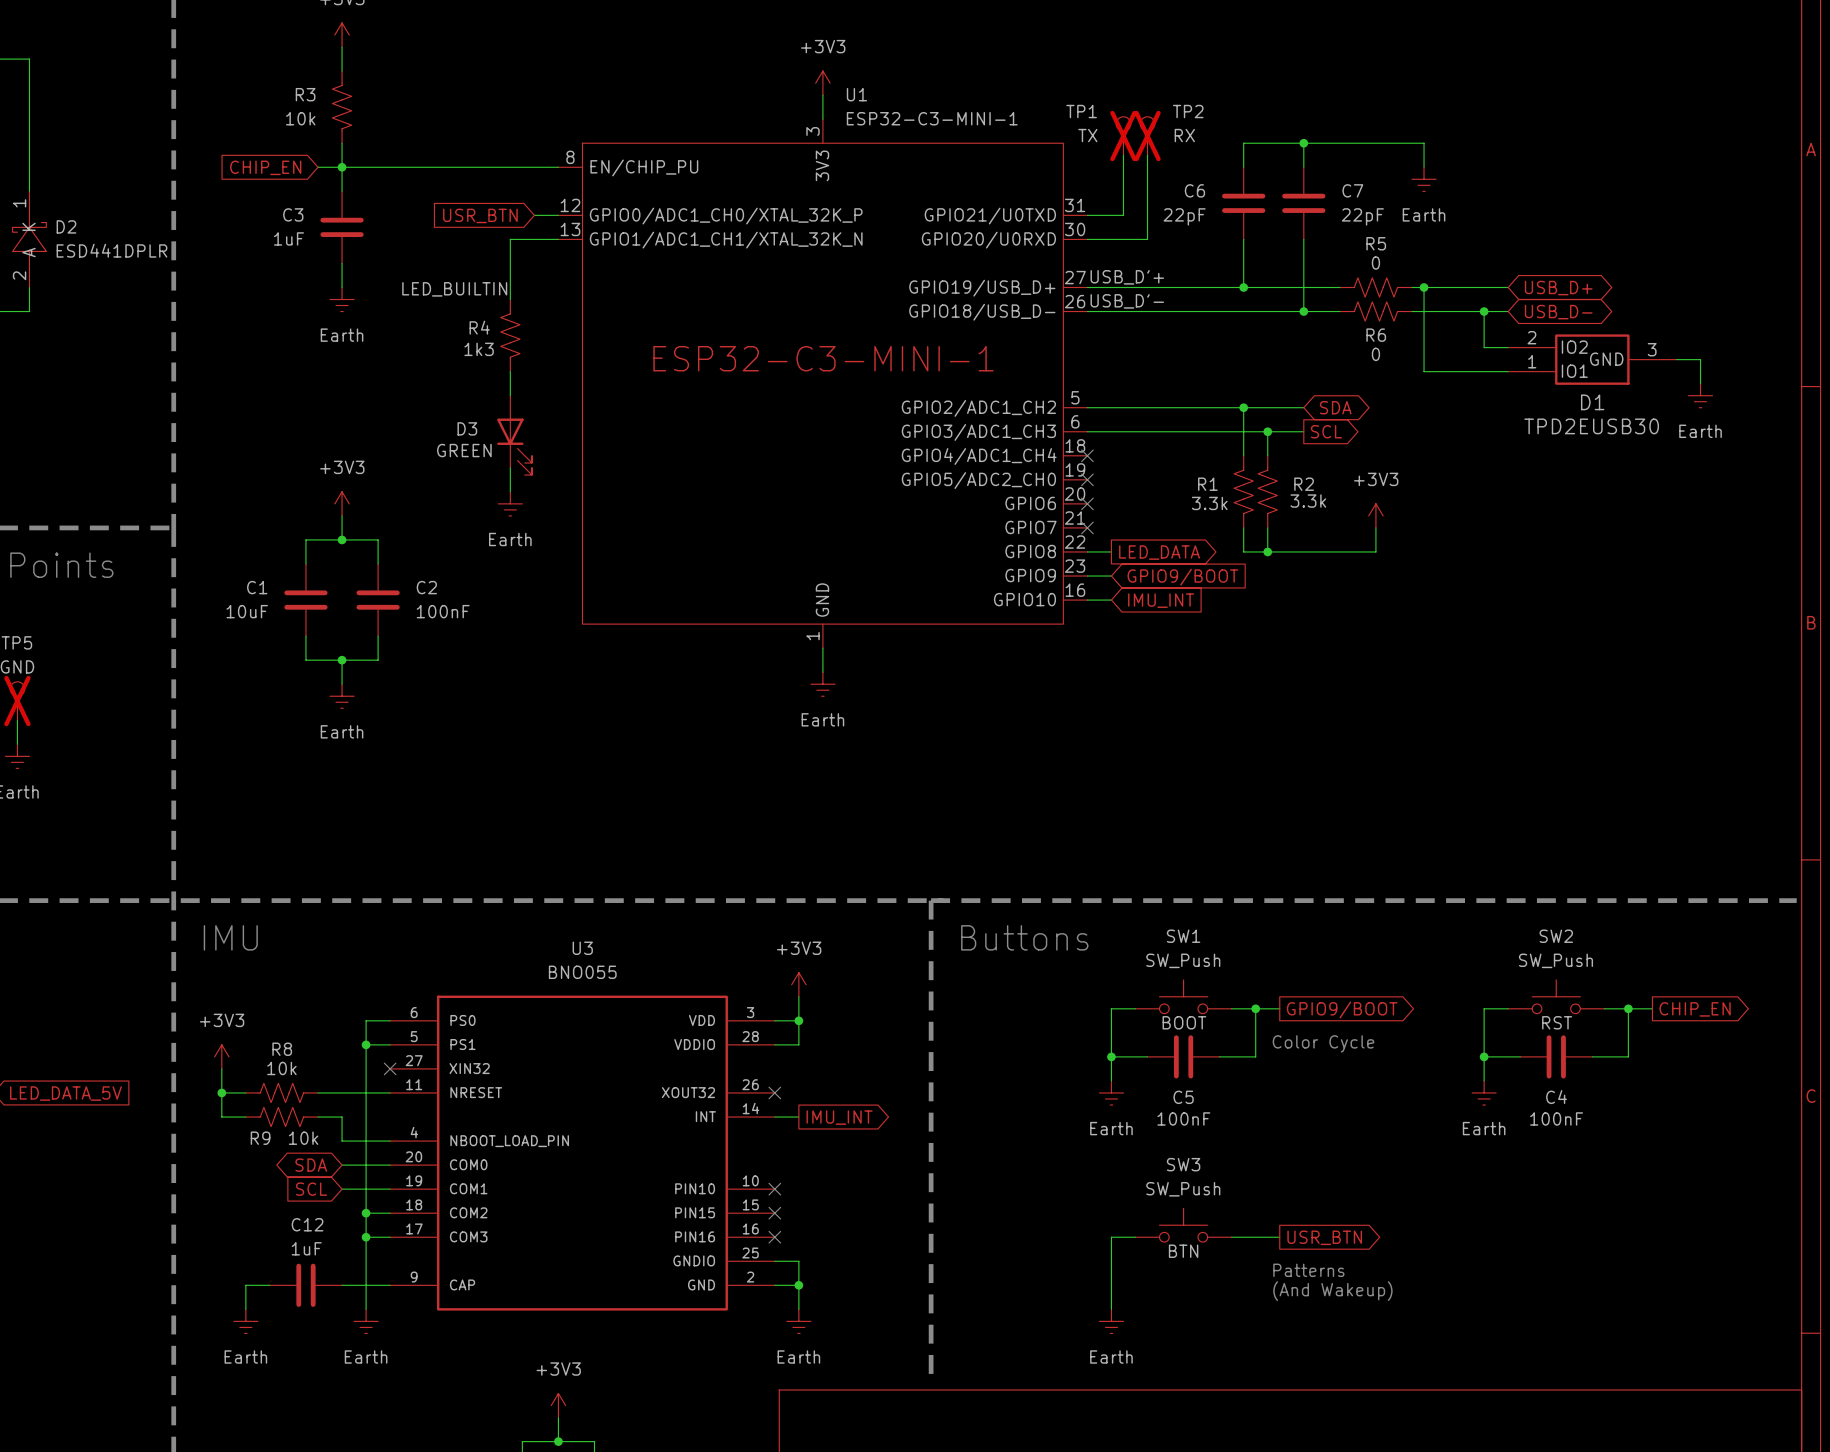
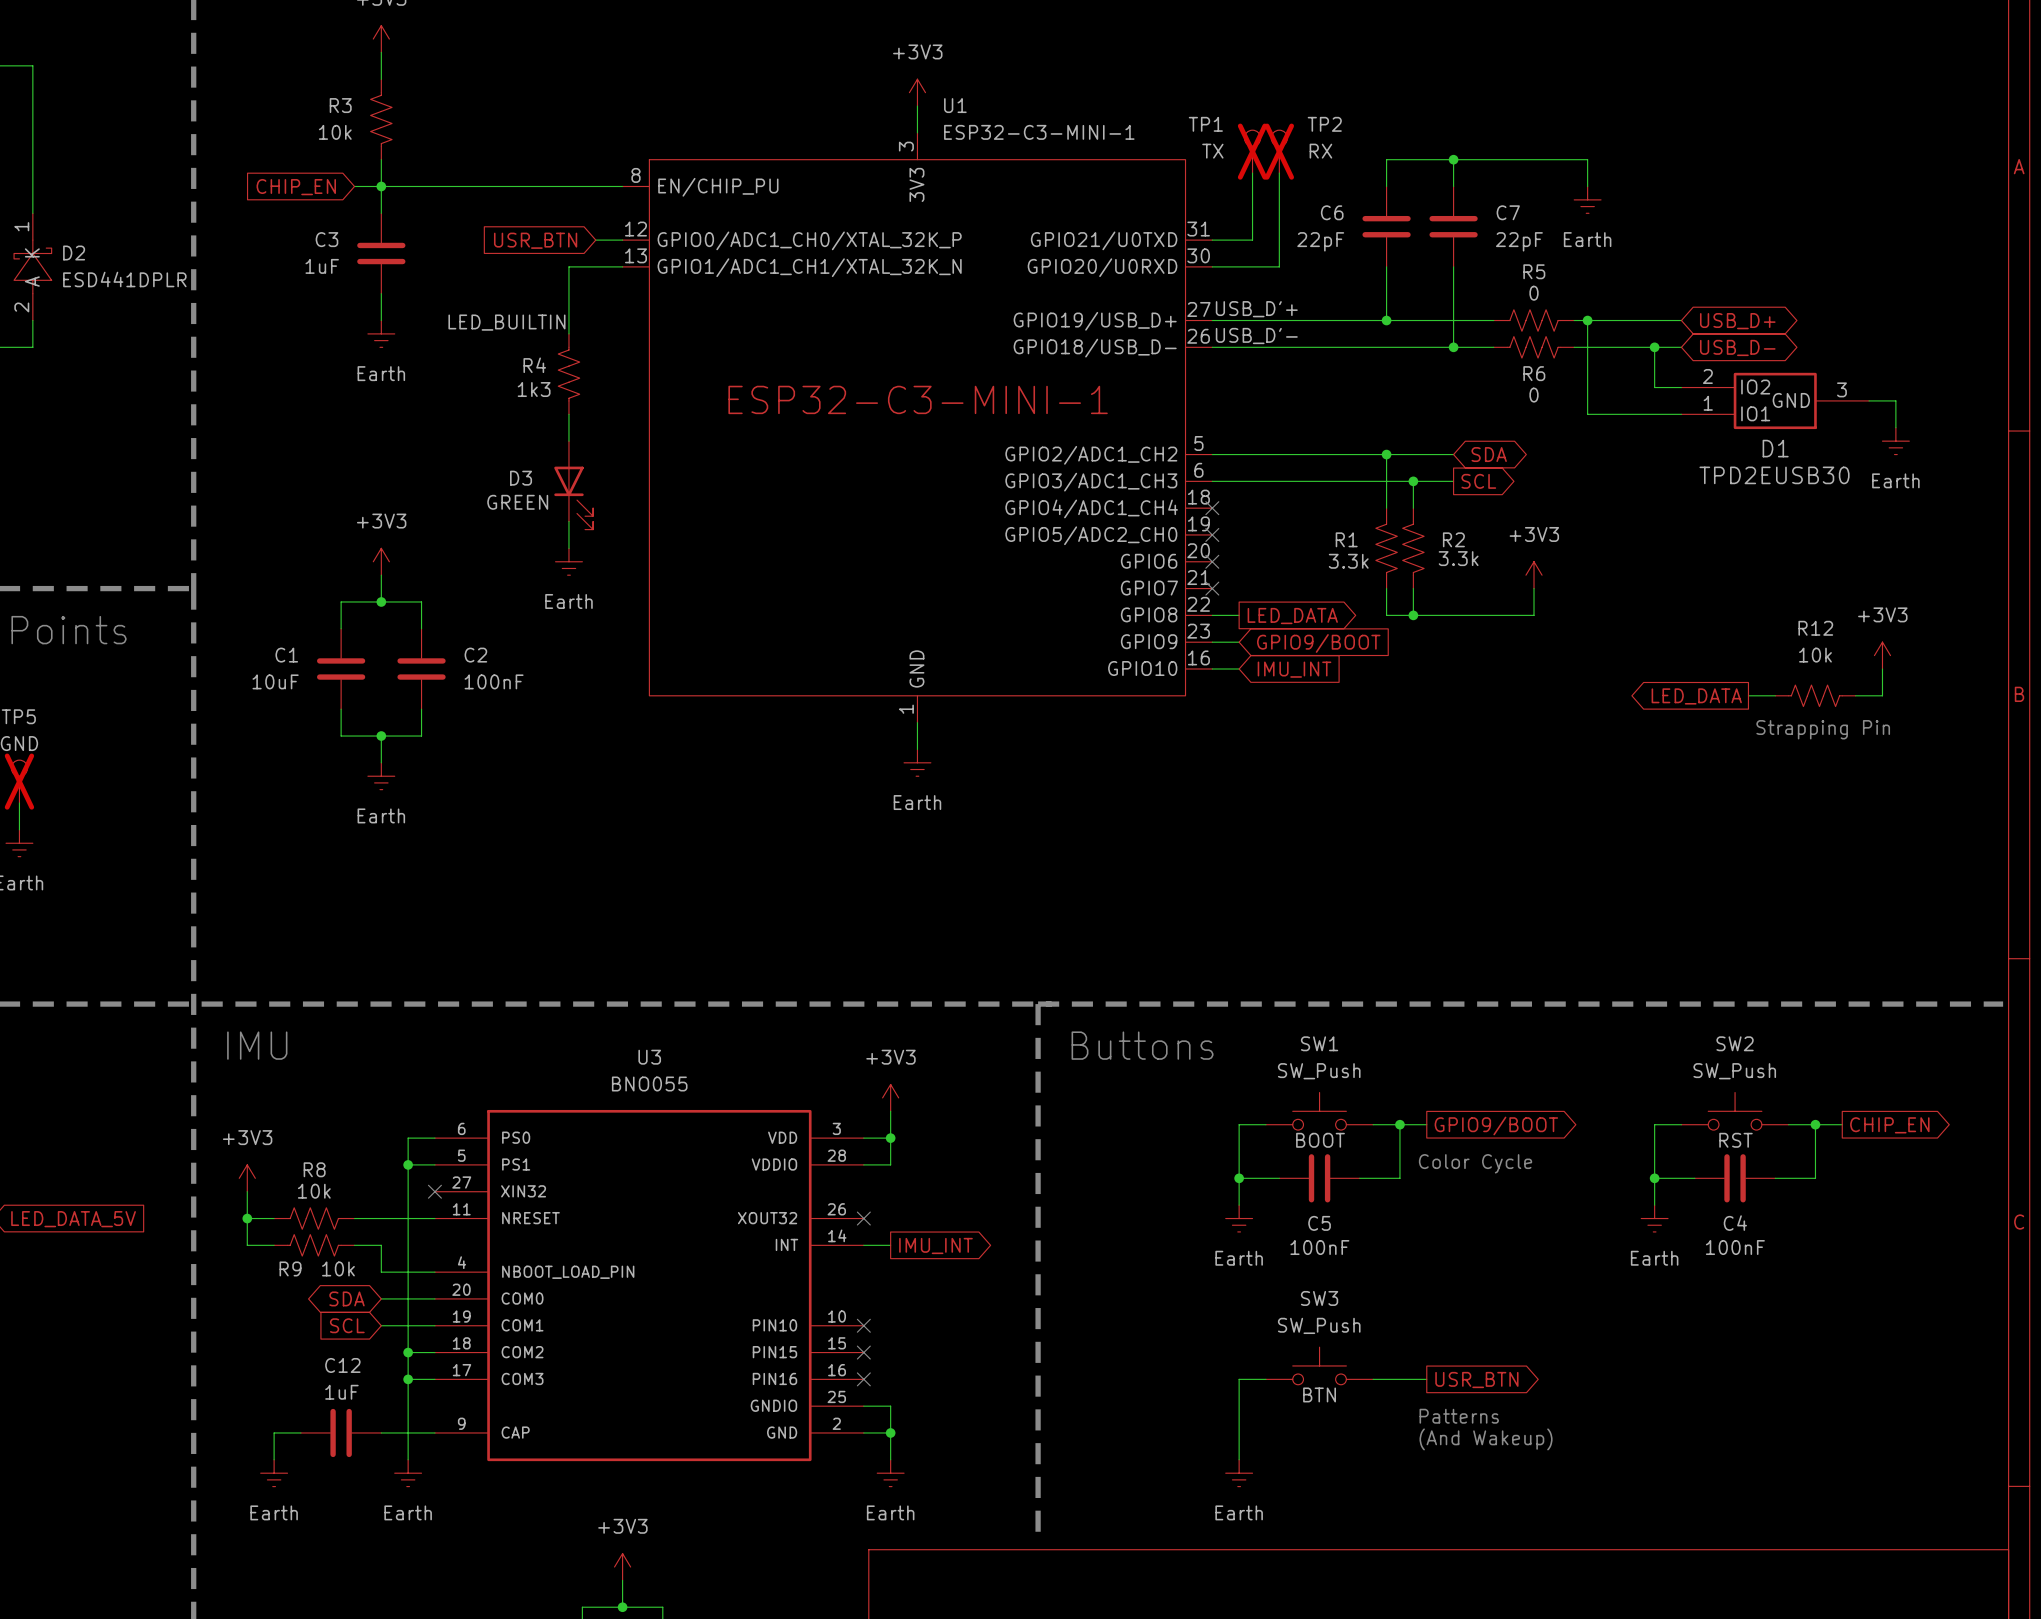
power symbol: none -> +3V3 (1882, 655)
wire: none -> (1882, 669) (1882, 695) (1855, 695)
global label: none -> LED_DATA (1696, 696)
wire: none -> (1748, 695) (1775, 695)
R12: none -> 10k (1815, 695)
text: none -> Strapping Pin (1823, 729)

